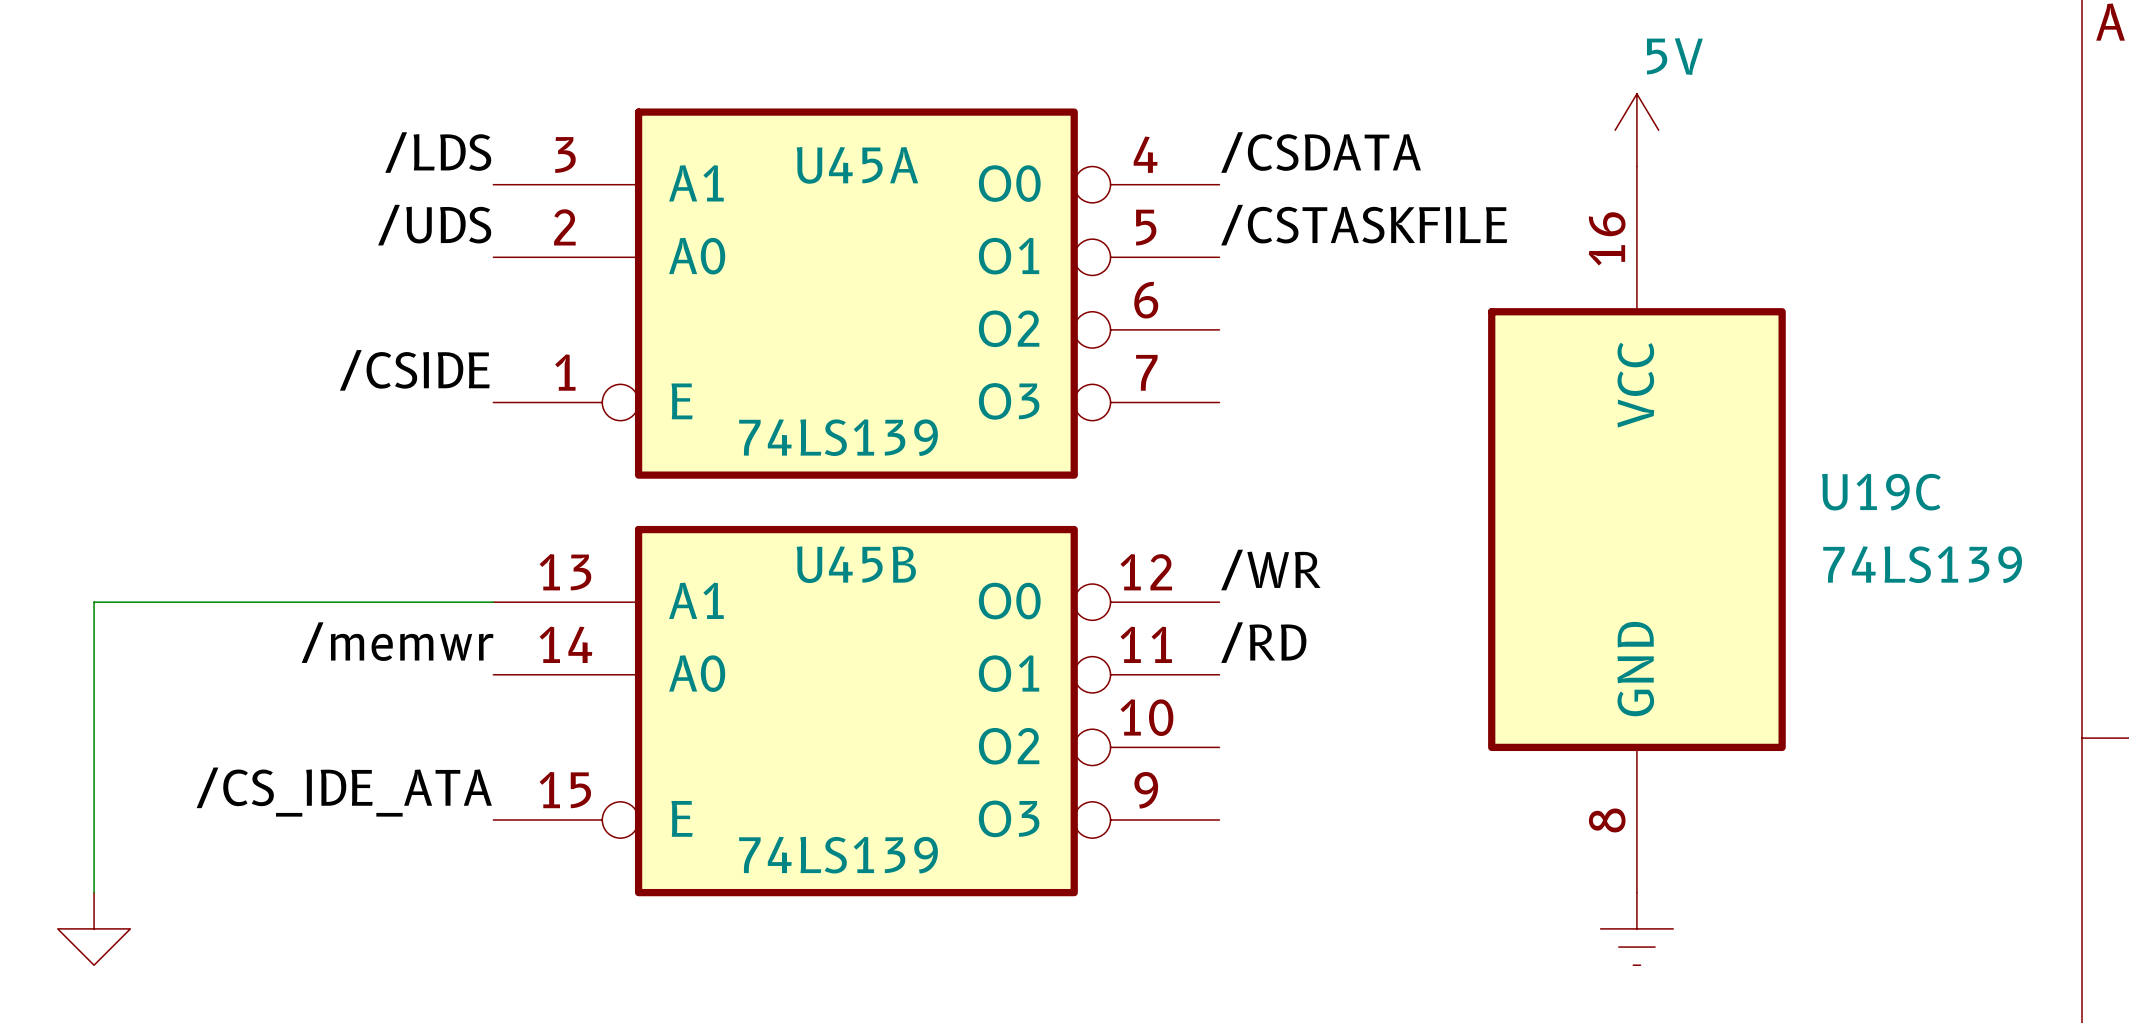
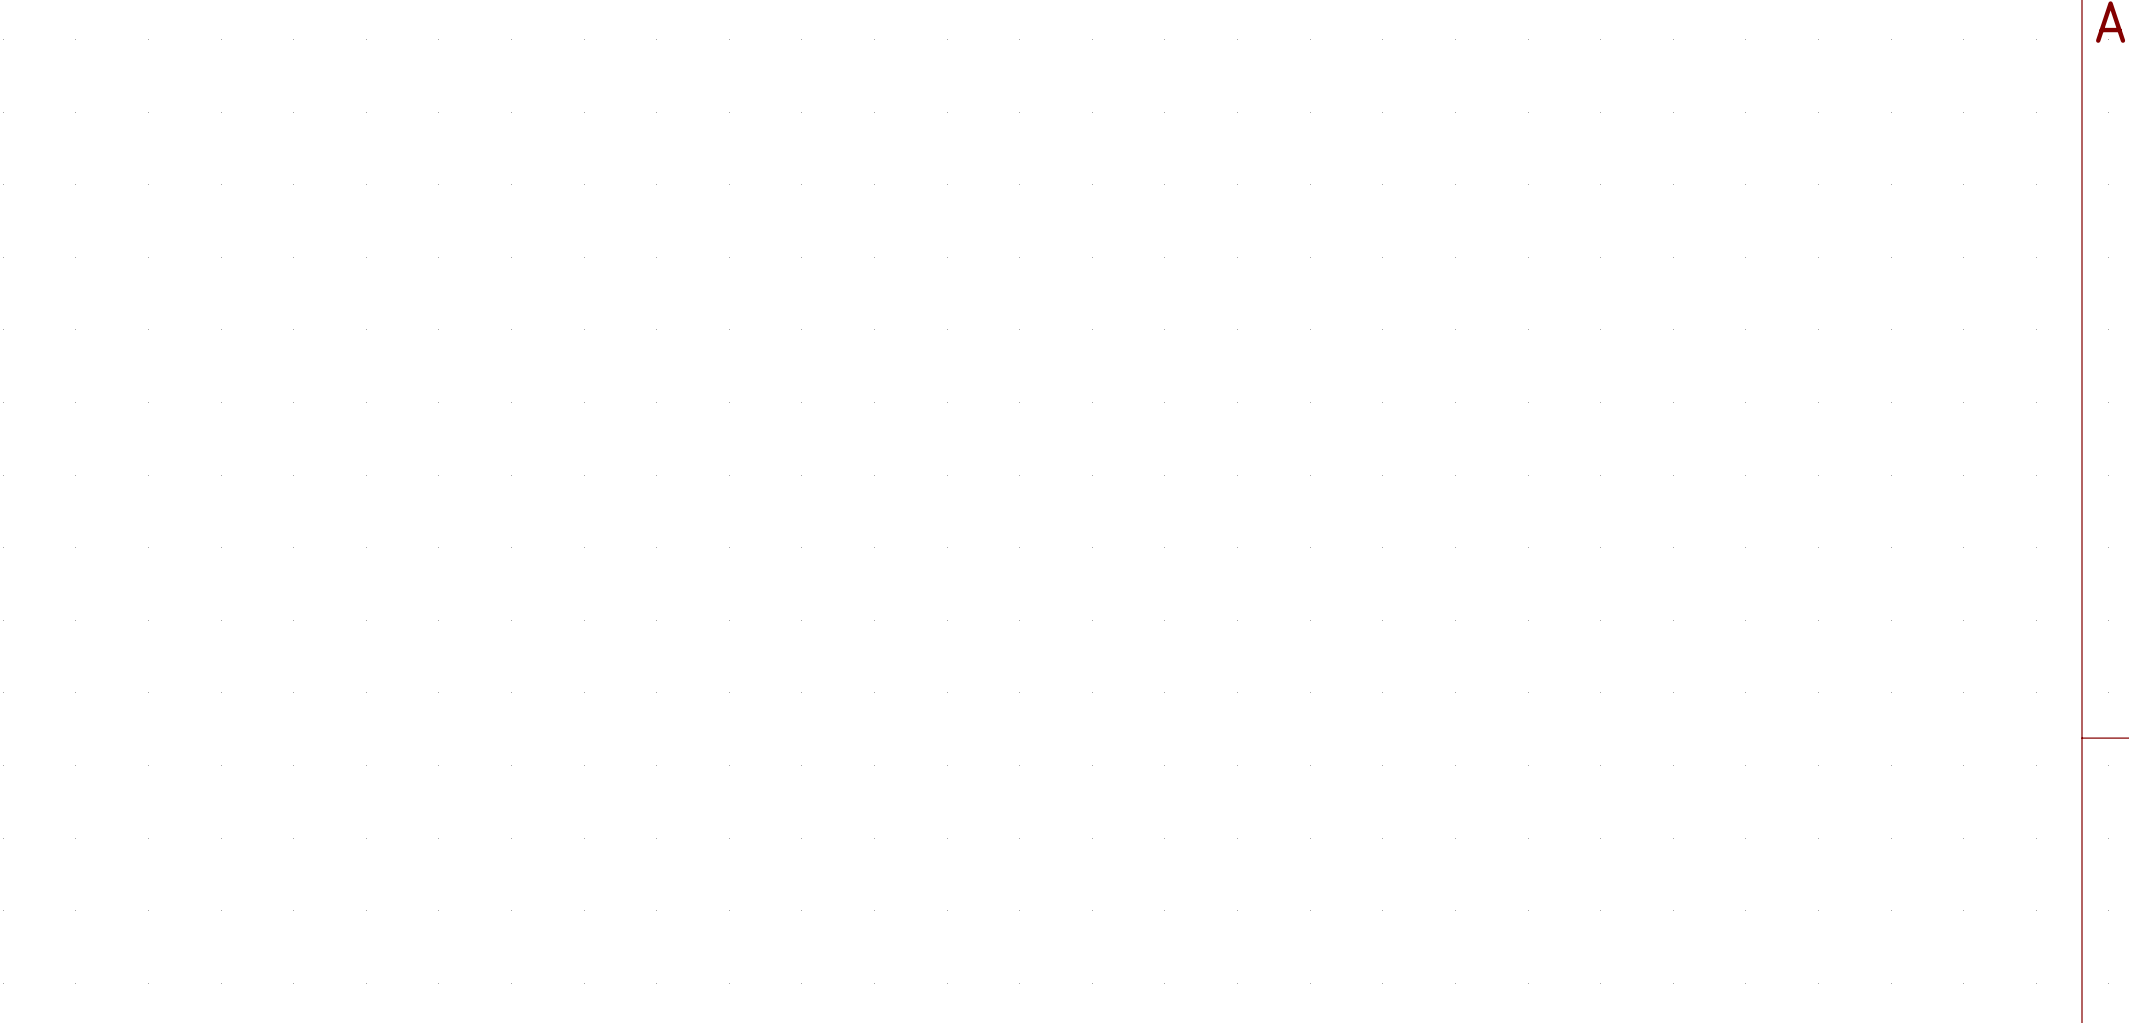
power symbol: 5V (1636, 130) -> none
label: /LDS (438, 152) -> none
label: /CSDATA (1321, 152) -> none
label: /UDS (434, 225) -> none
label: /CSTASKFILE (1364, 225) -> none
U45A: 74LS139 (856, 293) -> none
label: /CSIDE (414, 370) -> none
U19C: 74LS139 (1636, 529) -> none
label: /WR (1270, 570) -> none
wire: (493, 602) (94, 602) (94, 892) -> none
label: /memwr (397, 642) -> none
label: /RD (1263, 642) -> none
U45B: 74LS139 (856, 711) -> none
label: /CS_IDE_ATA (344, 792) -> none
power symbol: (94, 928) -> none
power symbol: (1636, 928) -> none

